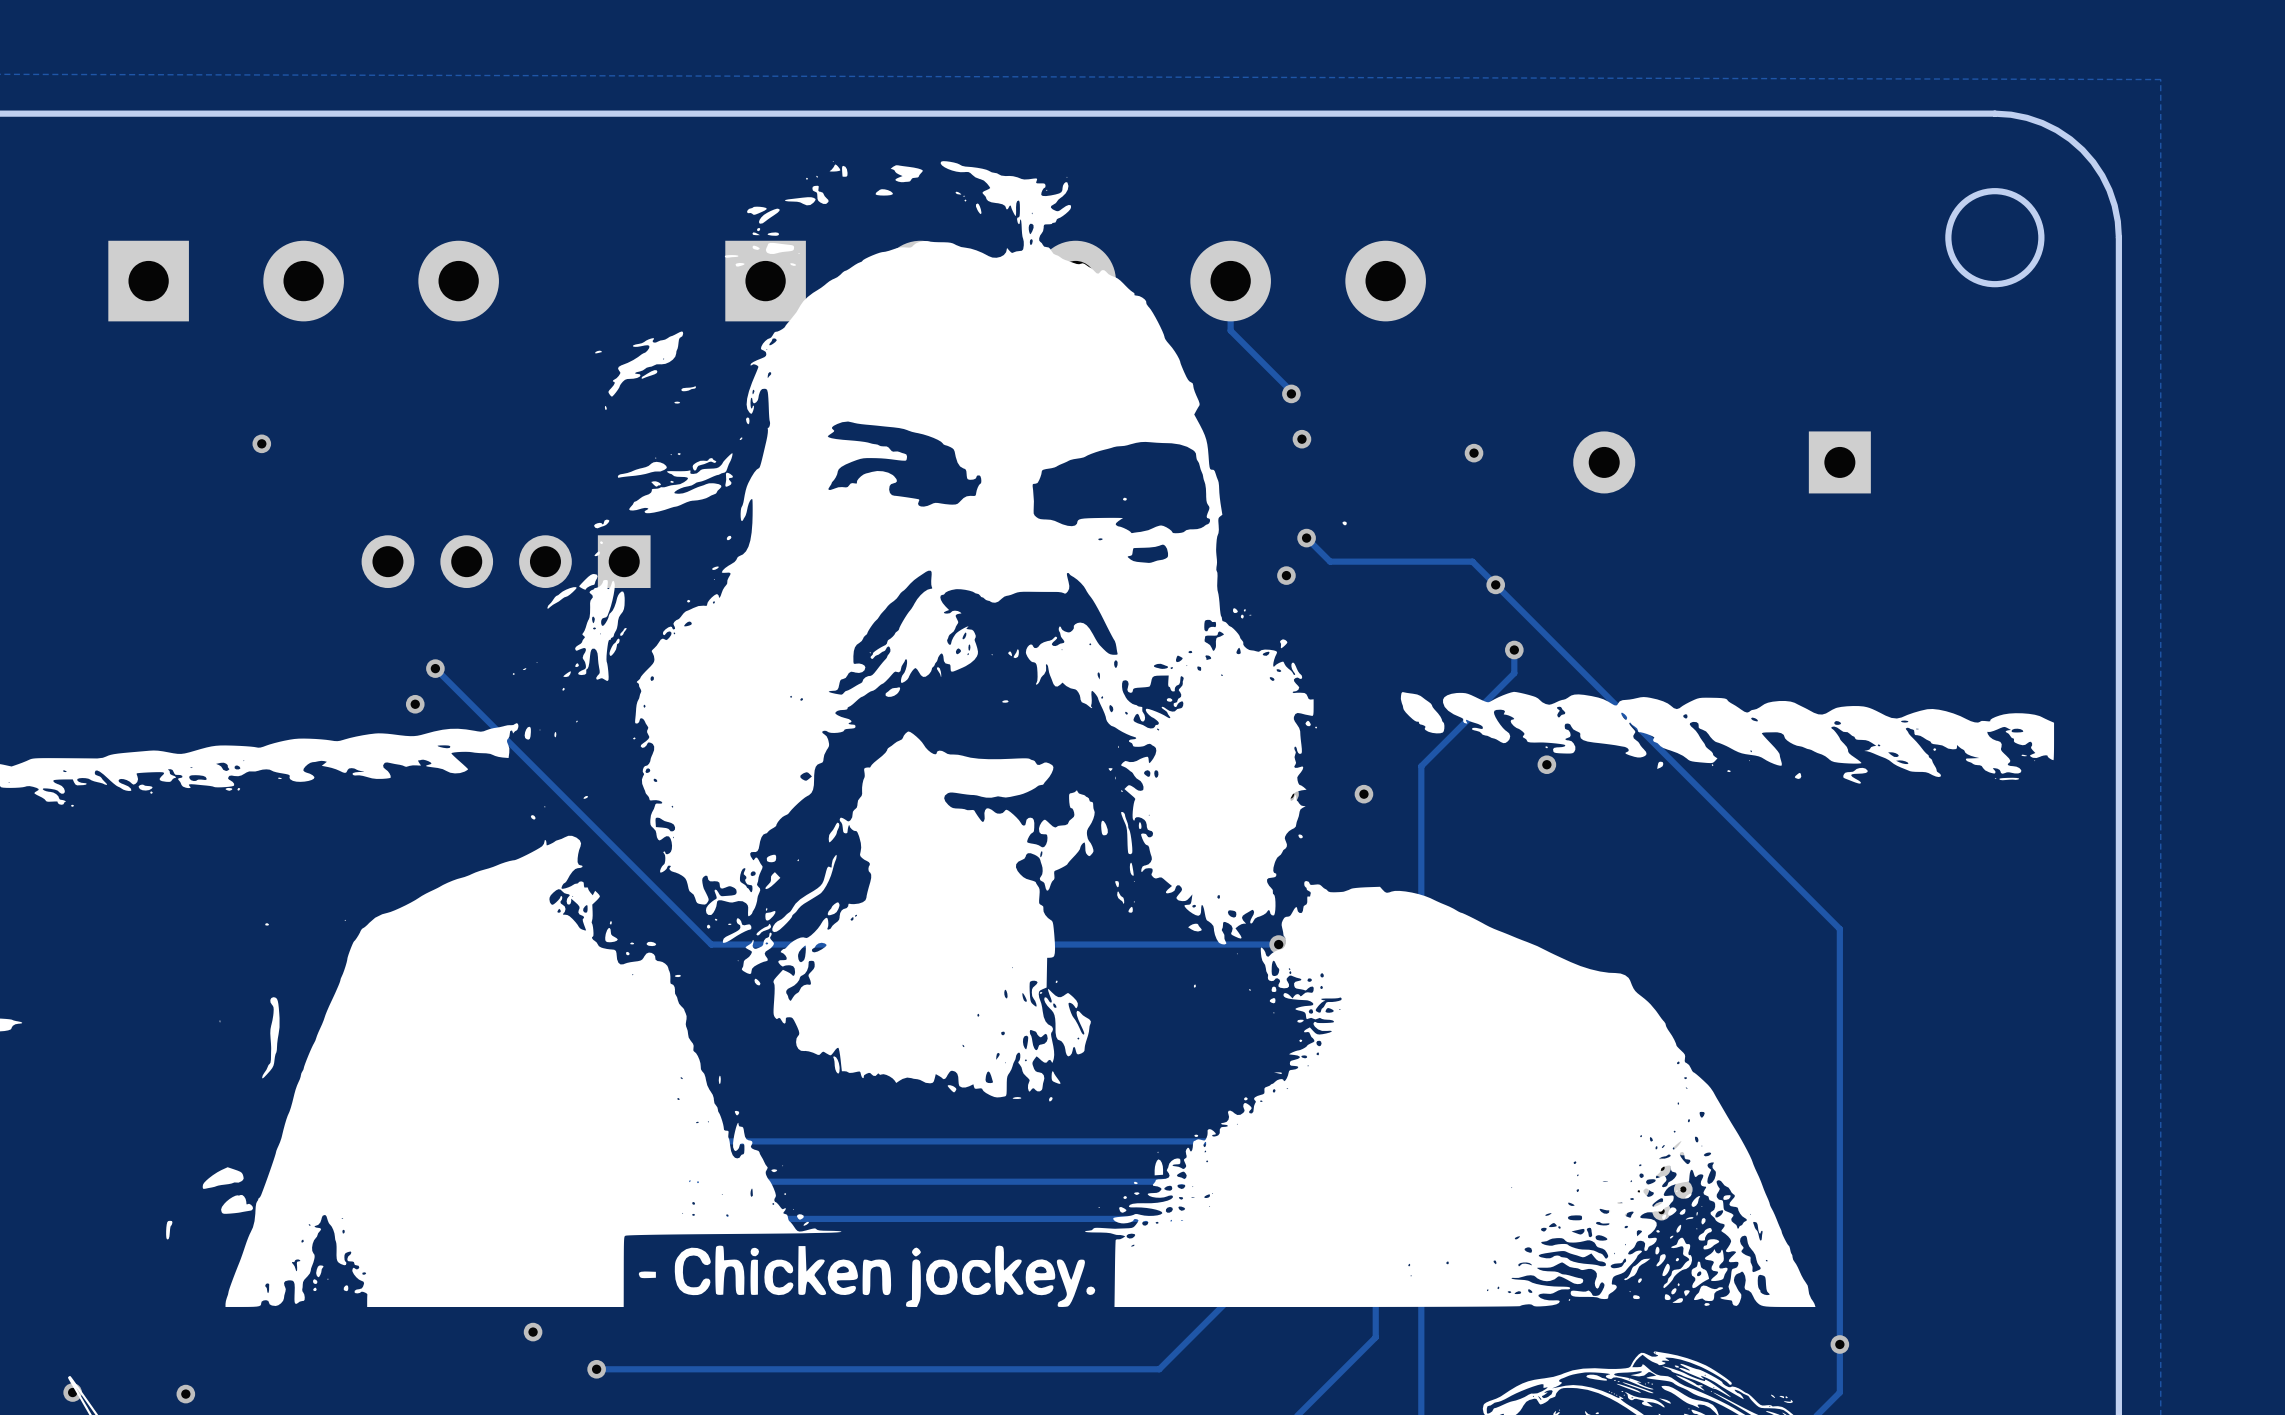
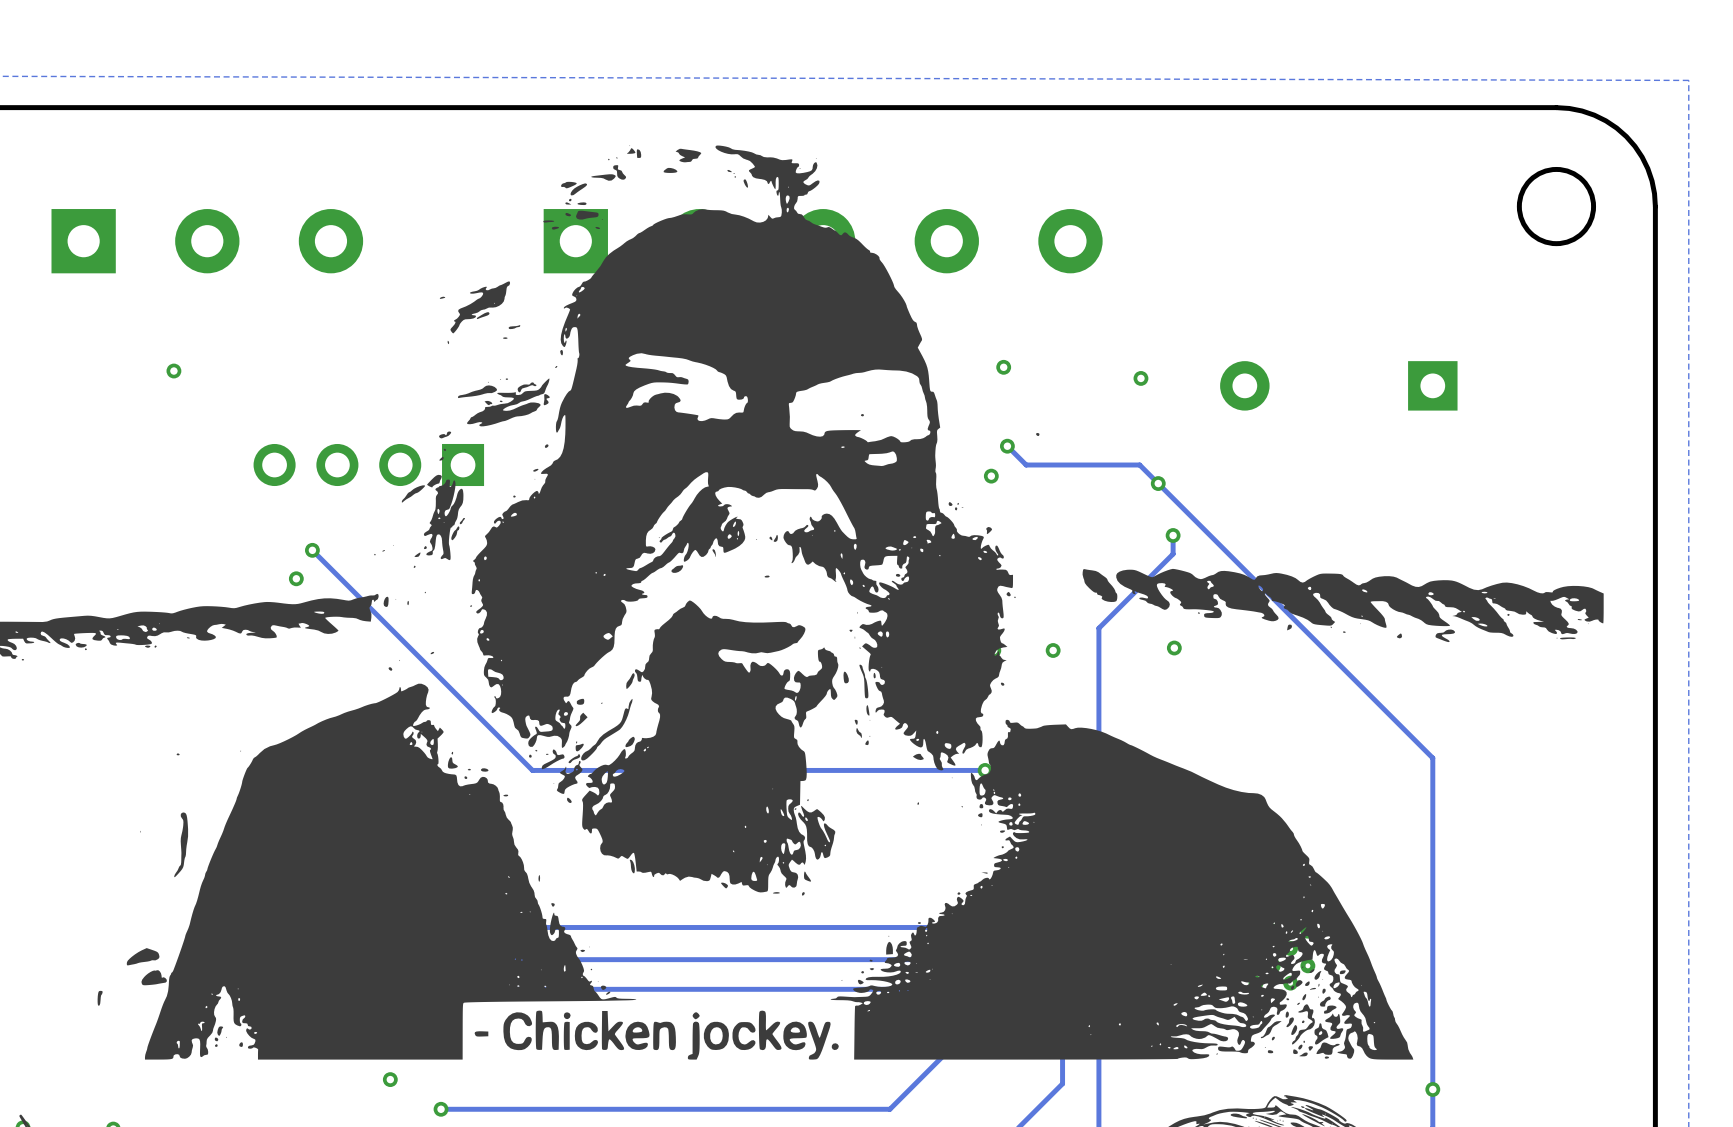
track: (1230, 281) (1230, 330) (1291, 391) (1291, 393) -> none
via: (1291, 393) -> none
via position: (1546, 764) -> (1174, 648)

